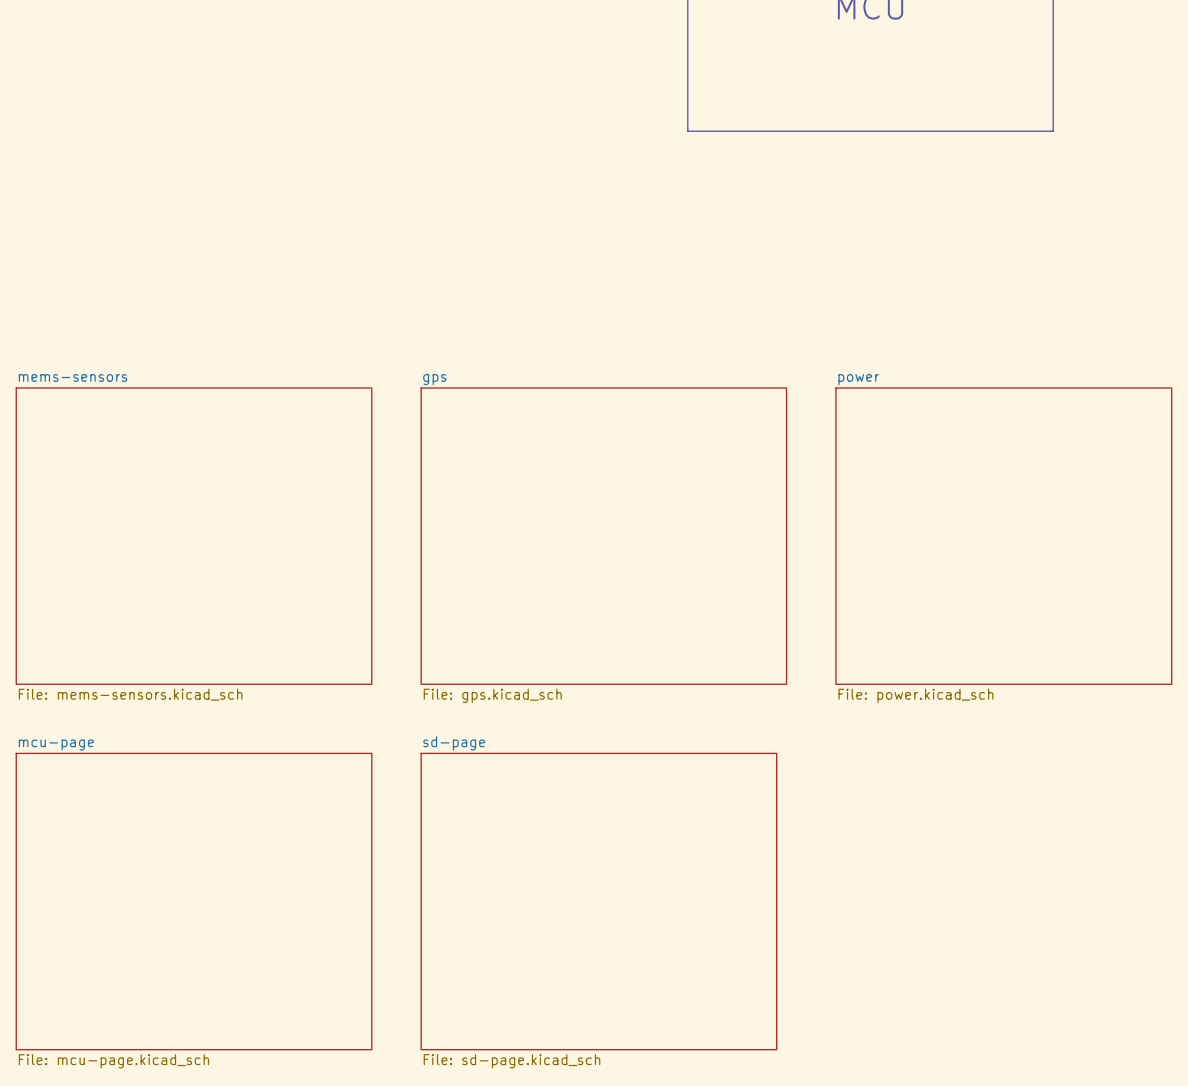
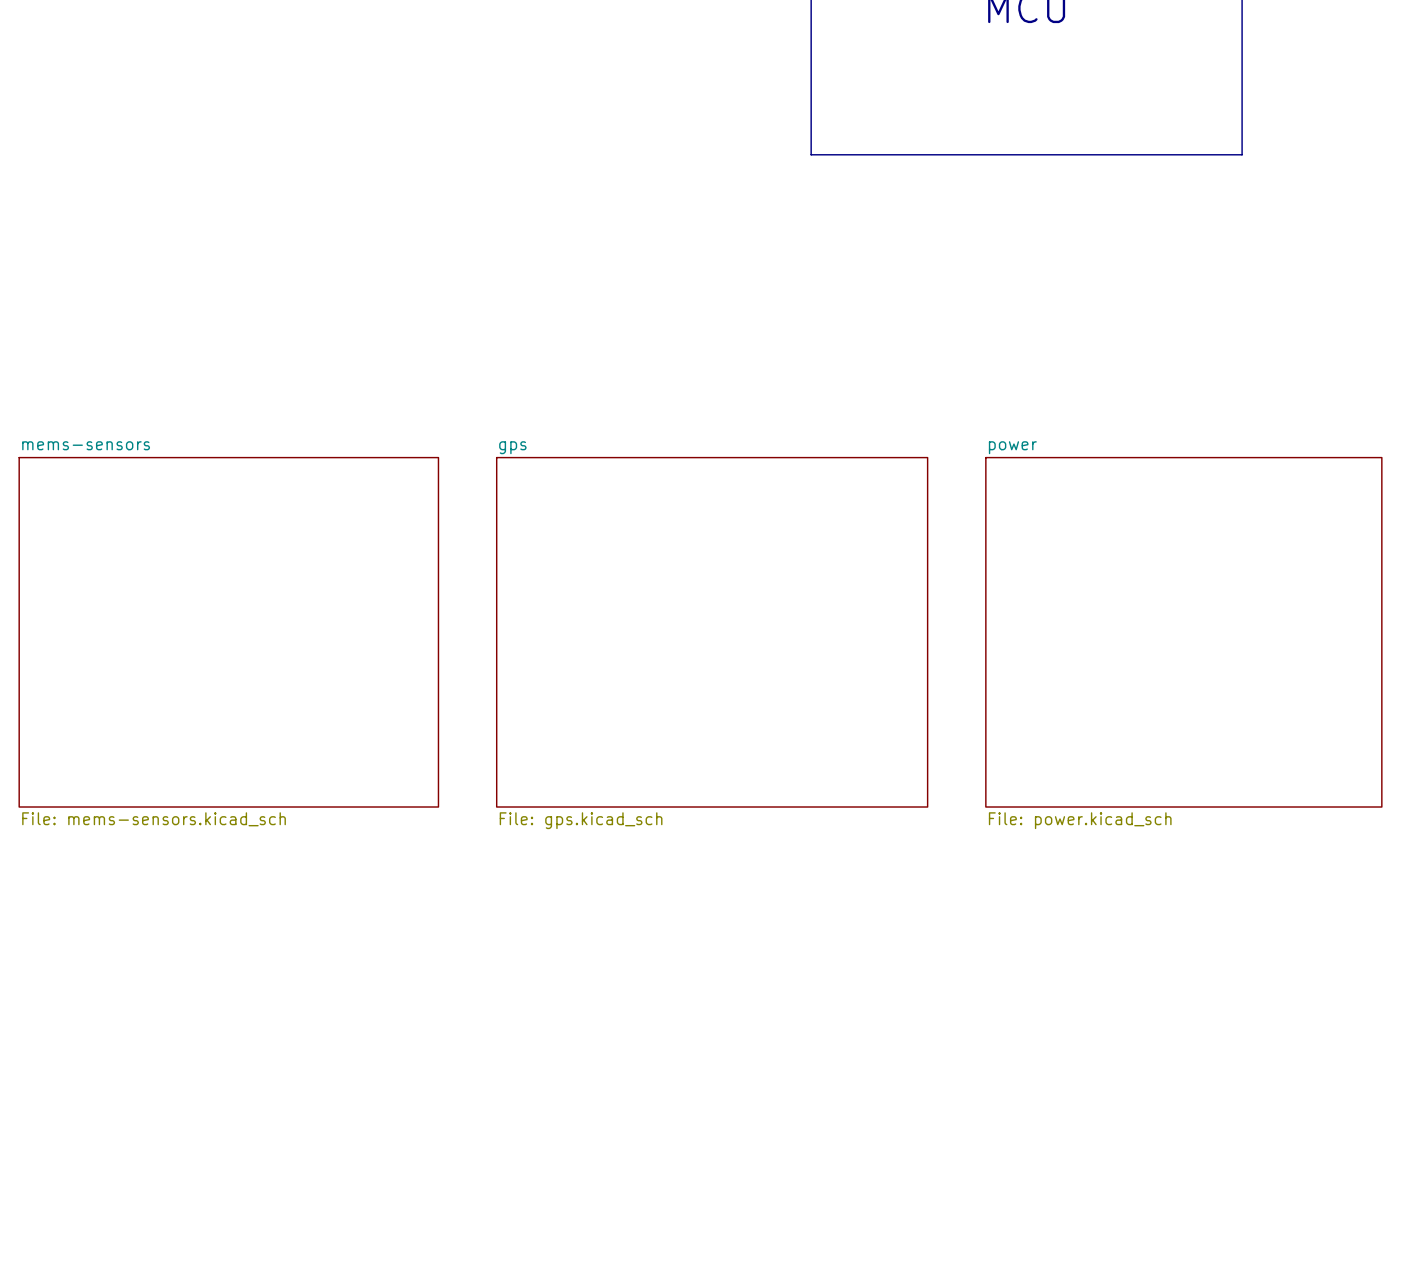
sheet mcu-page: File: mcu-page.kicad_sch (194, 901) -> none
sheet sd-page: File: sd-page.kicad_sch (598, 901) -> none

